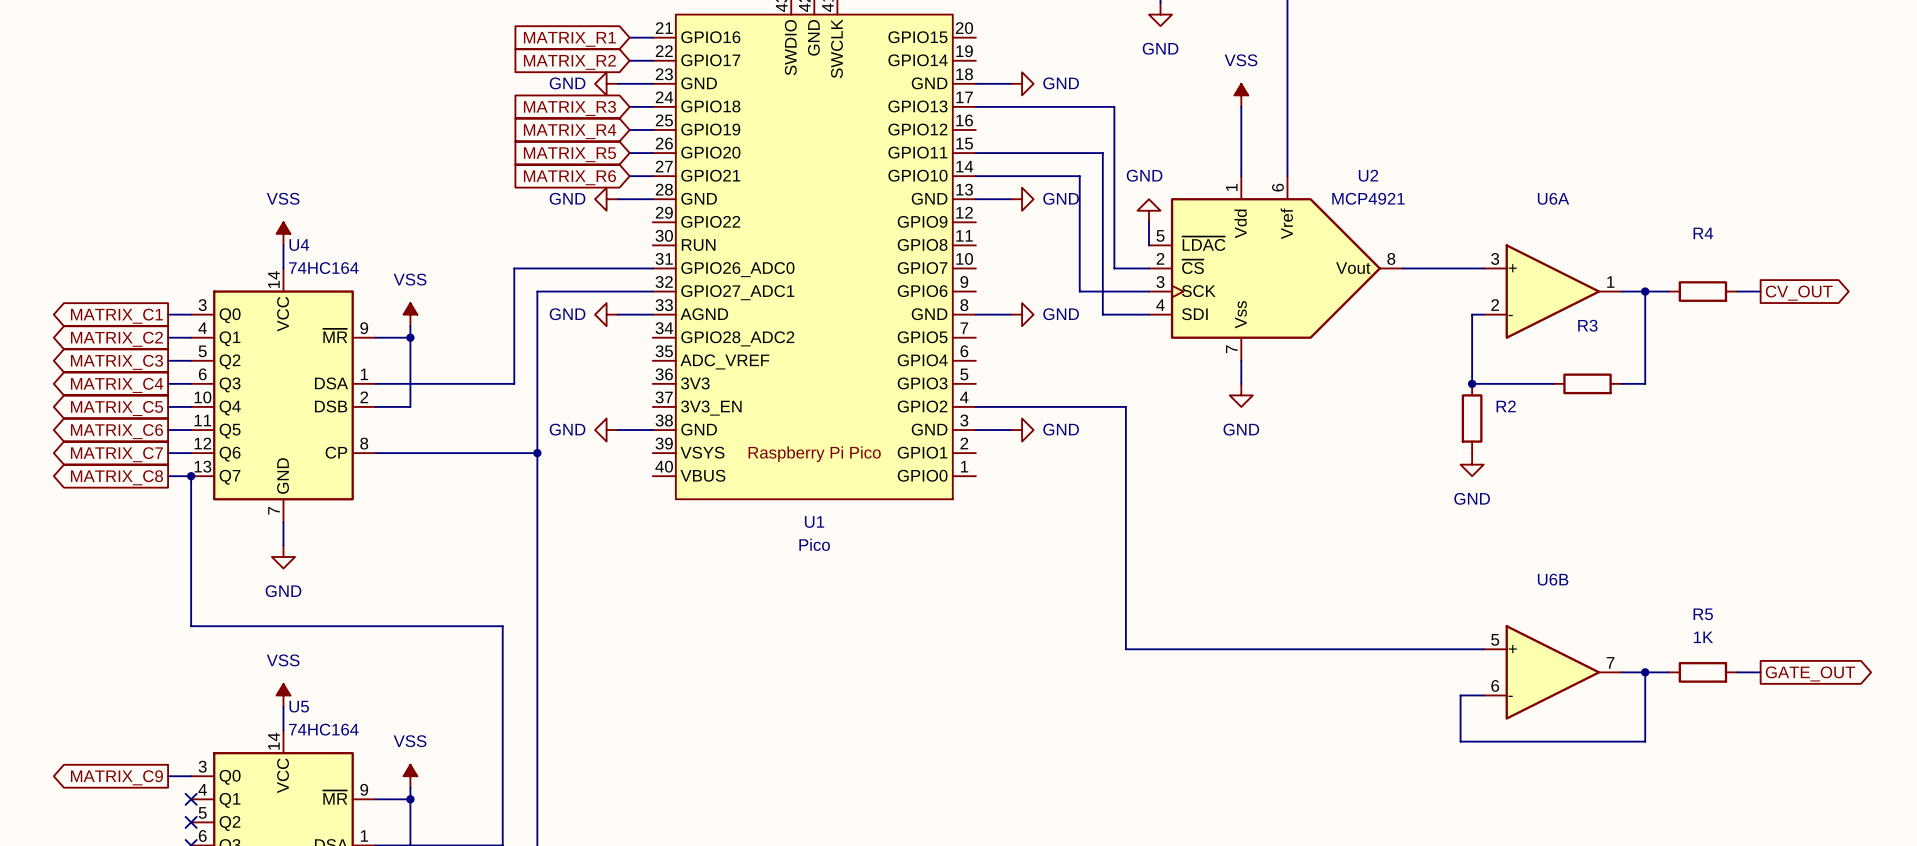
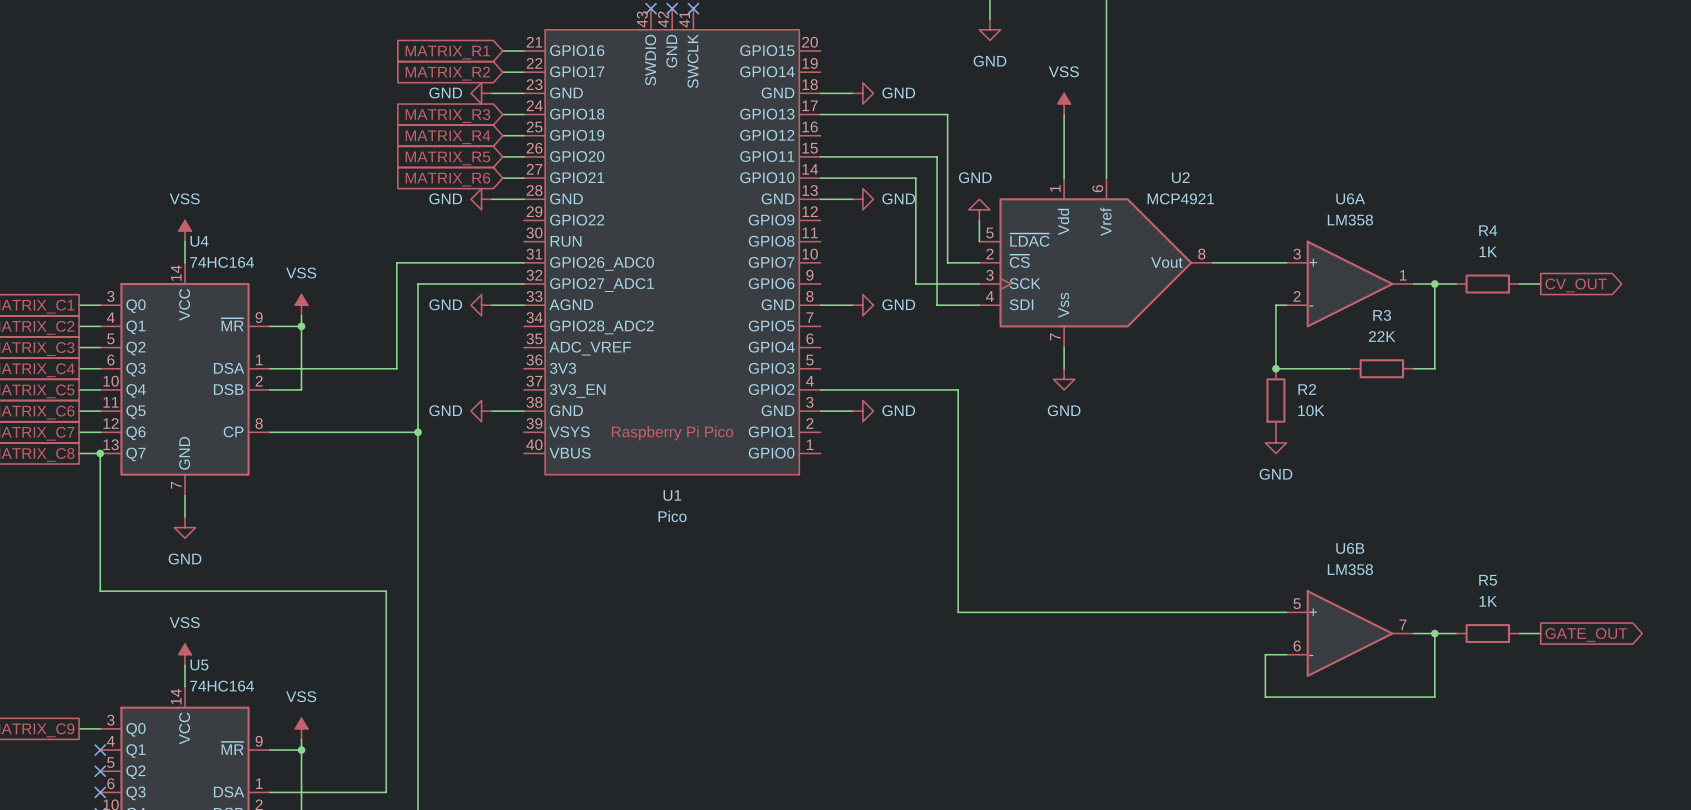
U6A value: none -> LM358 (1350, 220)
R4 value: none -> 1K (1488, 251)
R3 value: none -> 22K (1382, 336)
R2 value: none -> 10K (1311, 410)
U6B value: none -> LM358 (1350, 569)

